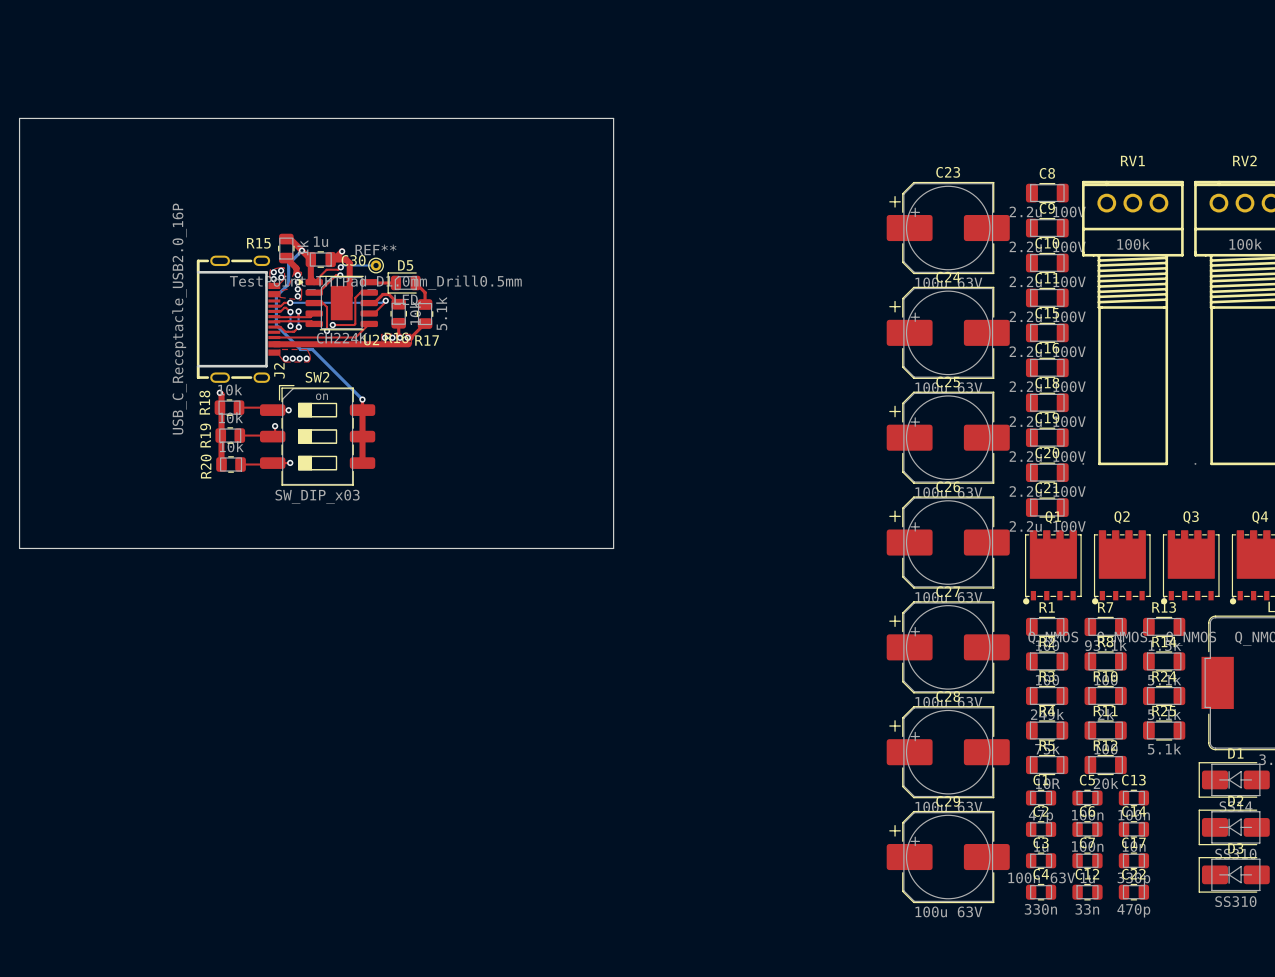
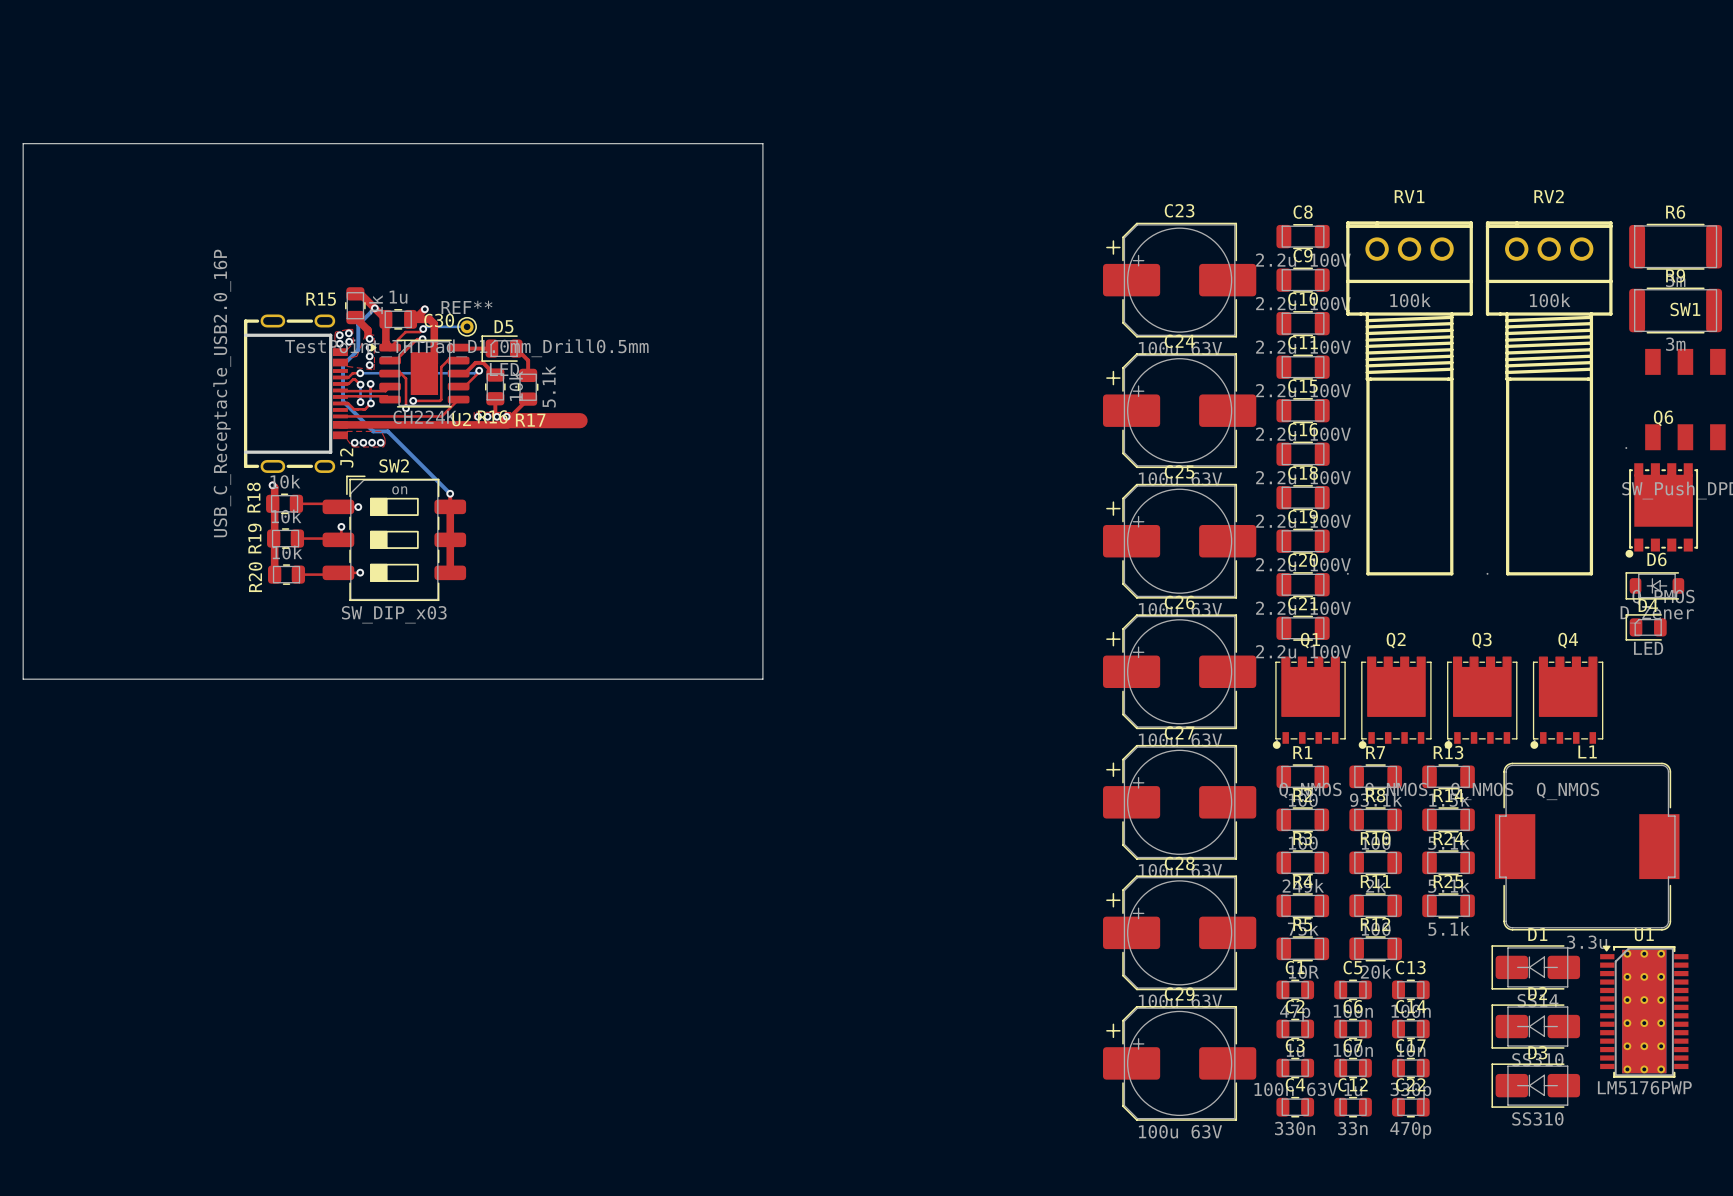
top track: none -> (508, 420) (580, 420)

